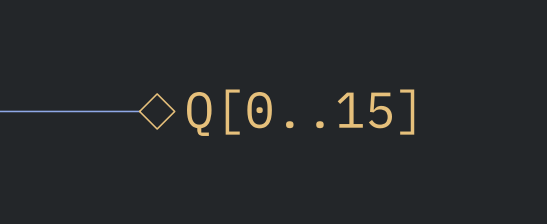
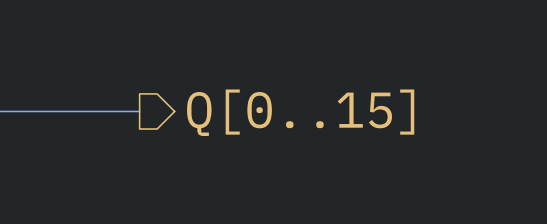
hierarchical label shape: bidirectional (300, 112) -> output (300, 112)

